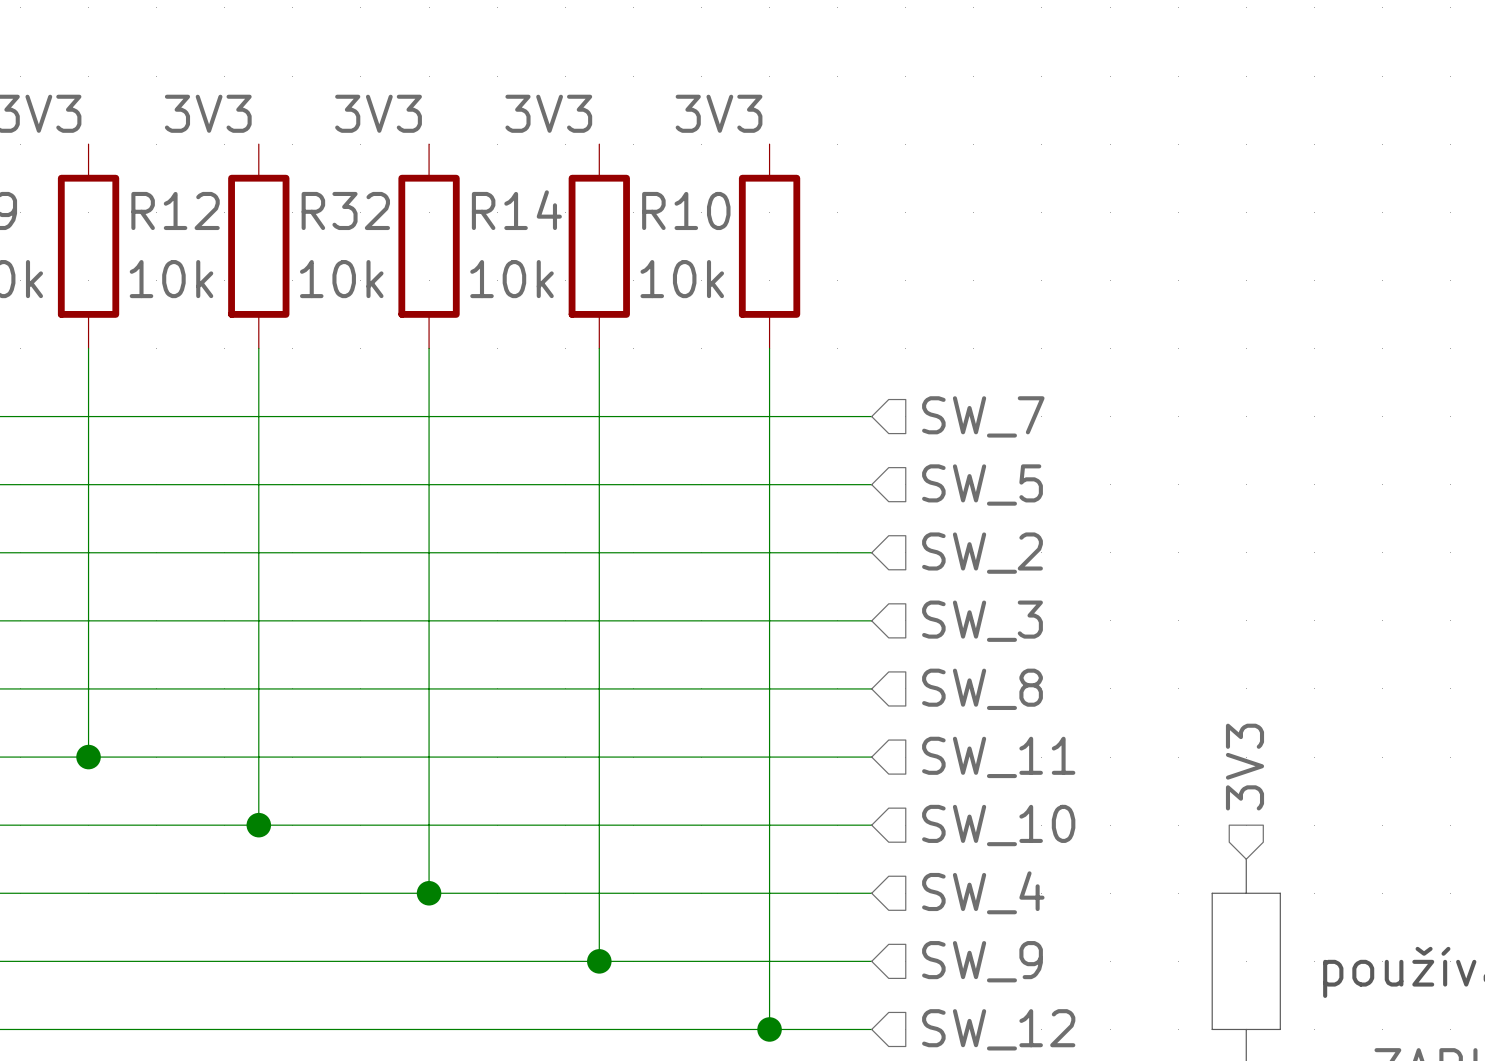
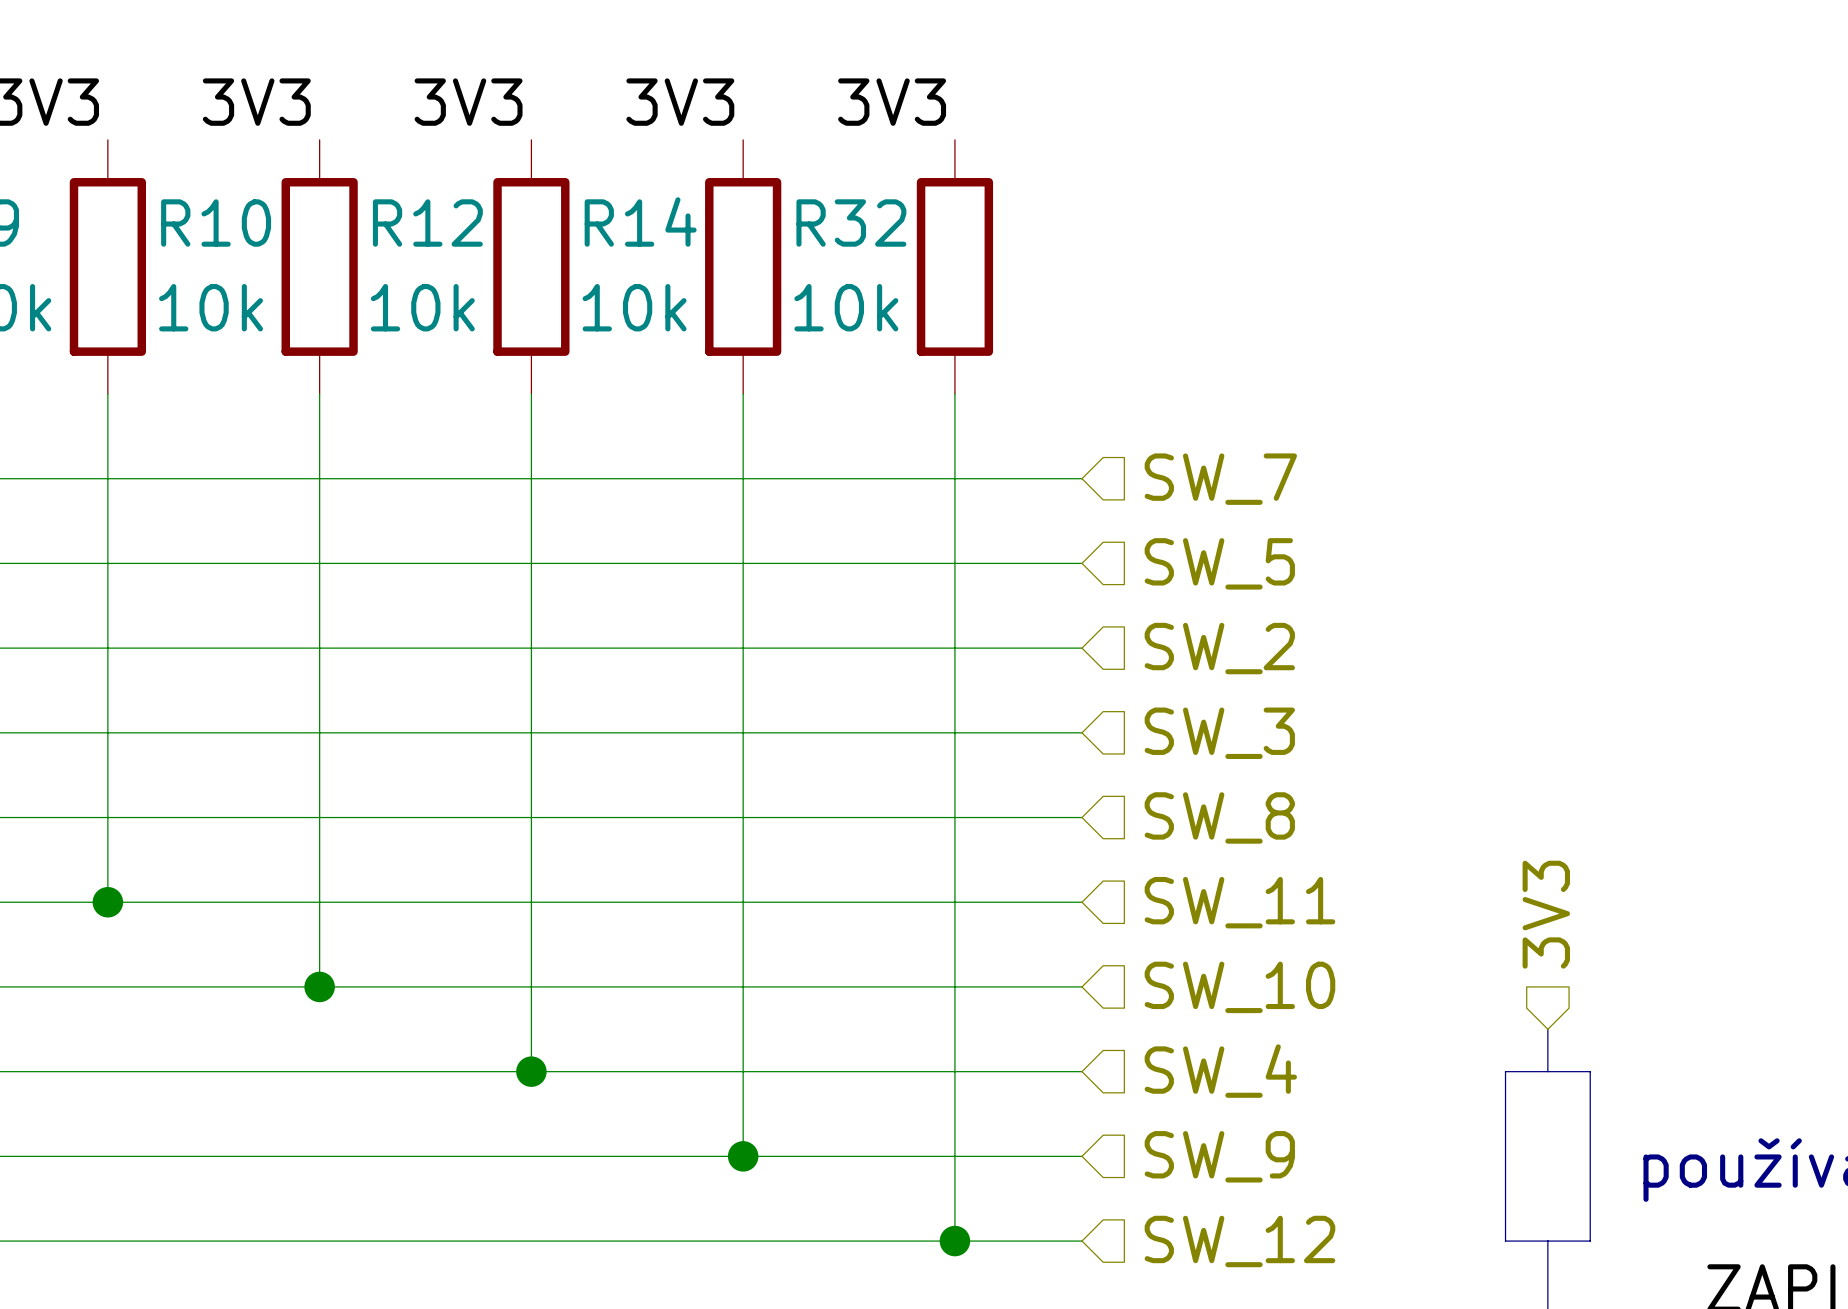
R12 name: R12 (175, 210) -> R10 (216, 223)
R32 name: R32 (345, 210) -> R12 (427, 223)
R10 name: R10 (686, 210) -> R32 (851, 223)

